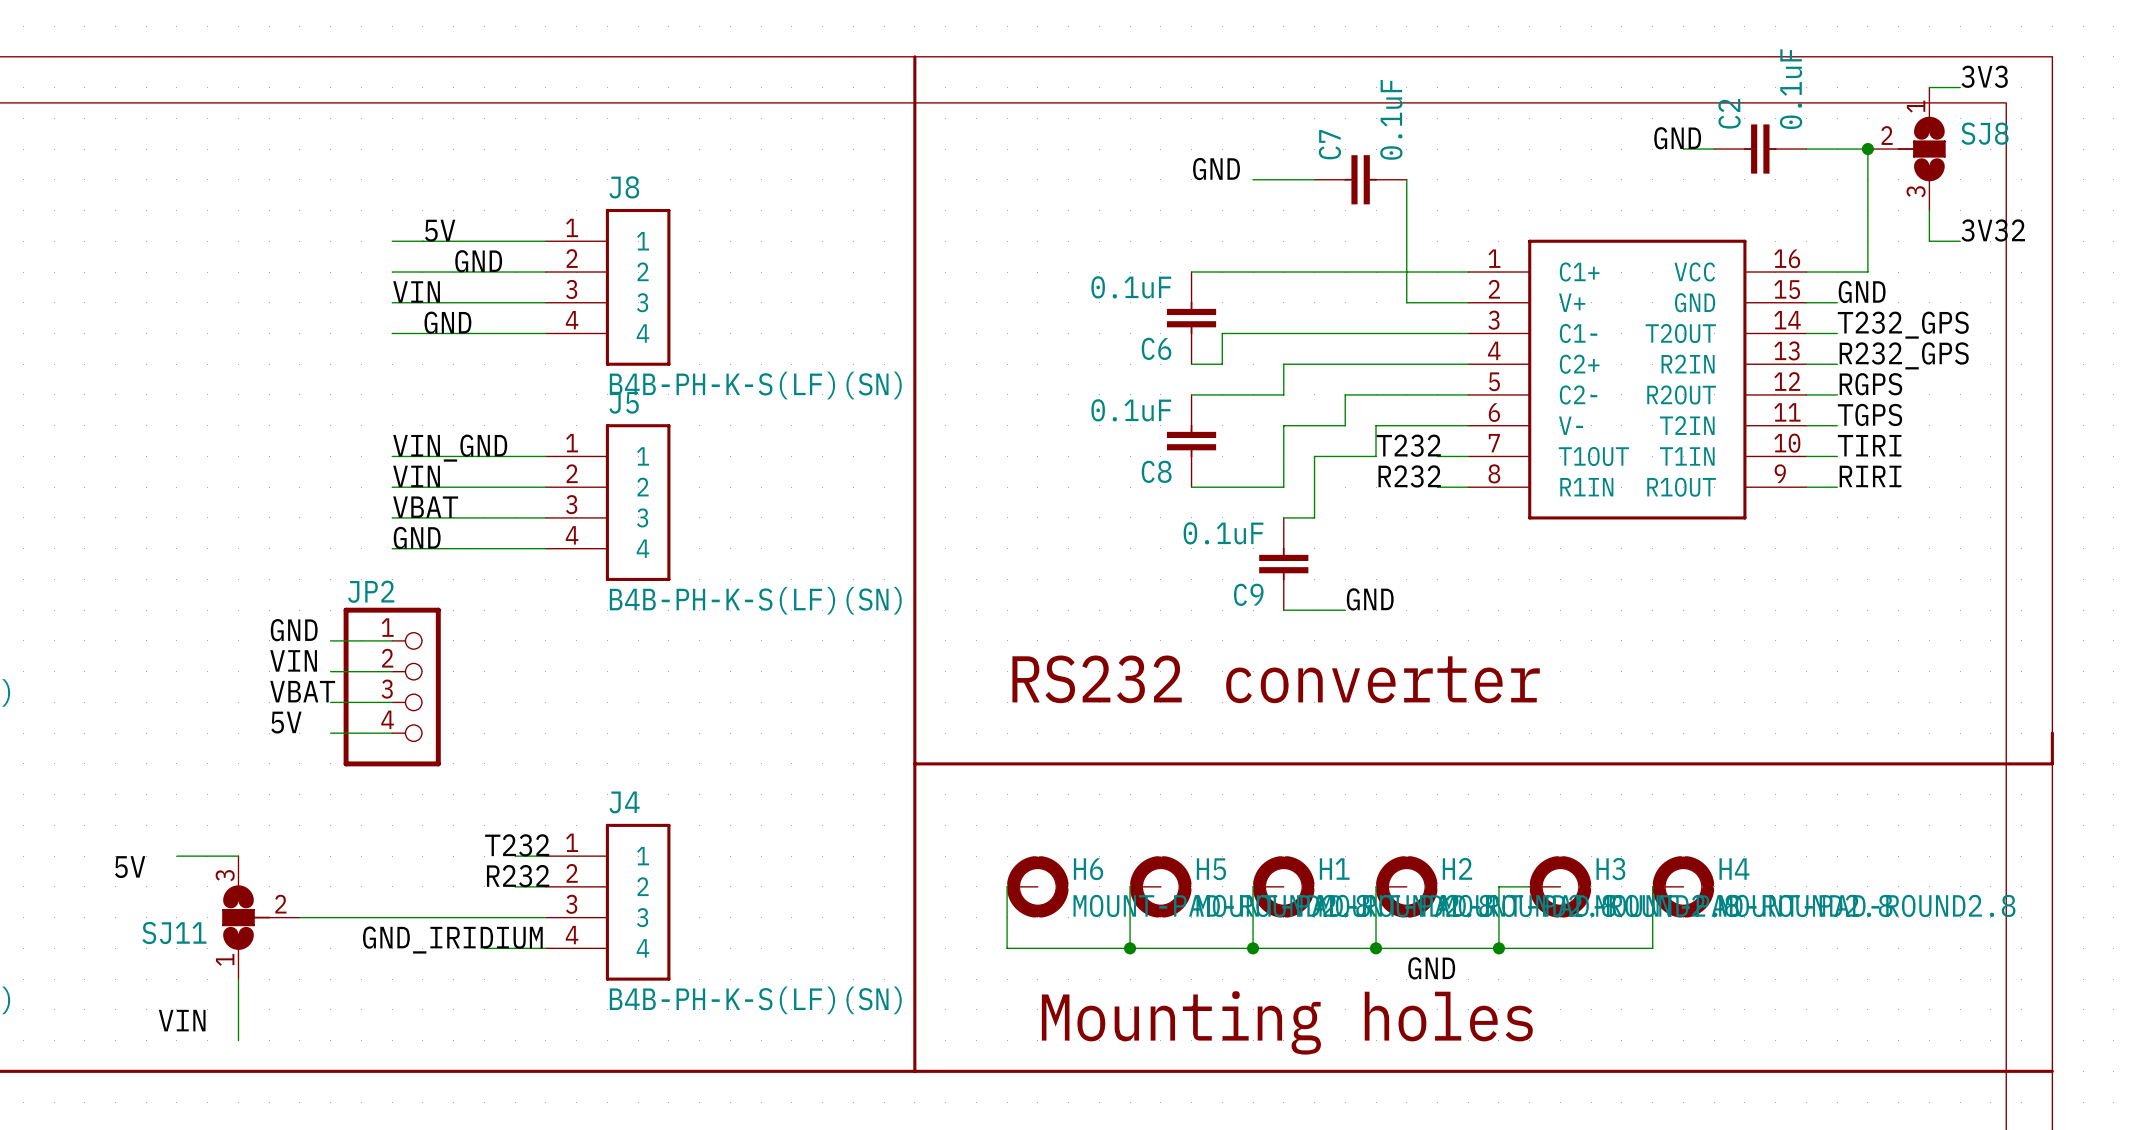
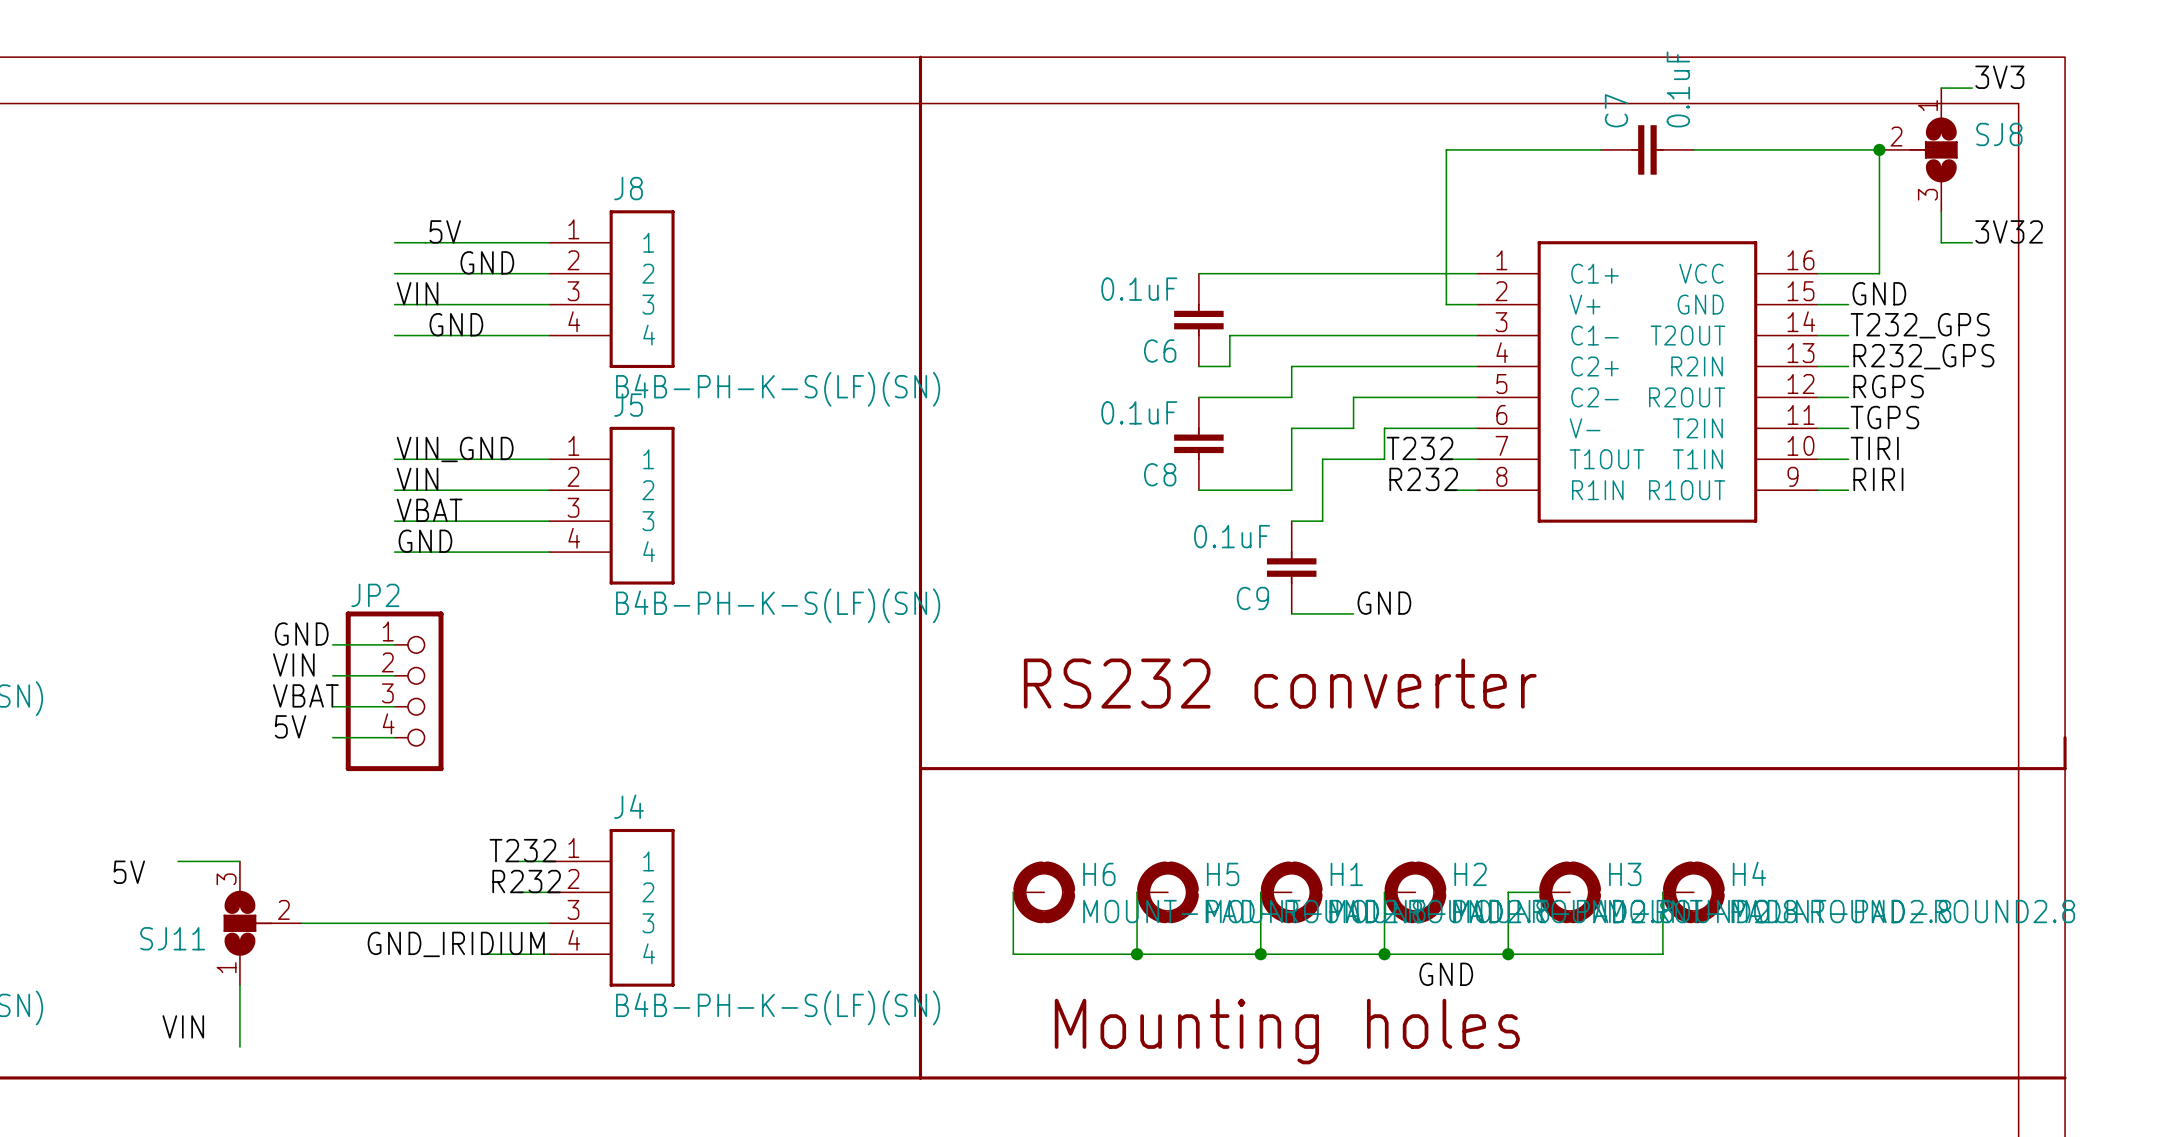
label: GND (1677, 138) -> none
C2: 0.1uF (1760, 149) -> none
label: GND (1216, 169) -> none
wire: (1253, 179) (1314, 179) -> none
C7 position: (1360, 179) -> (1647, 149)
wire: (1406, 179) (1406, 302) (1437, 302) -> (1601, 149) (1446, 149) (1446, 304)

